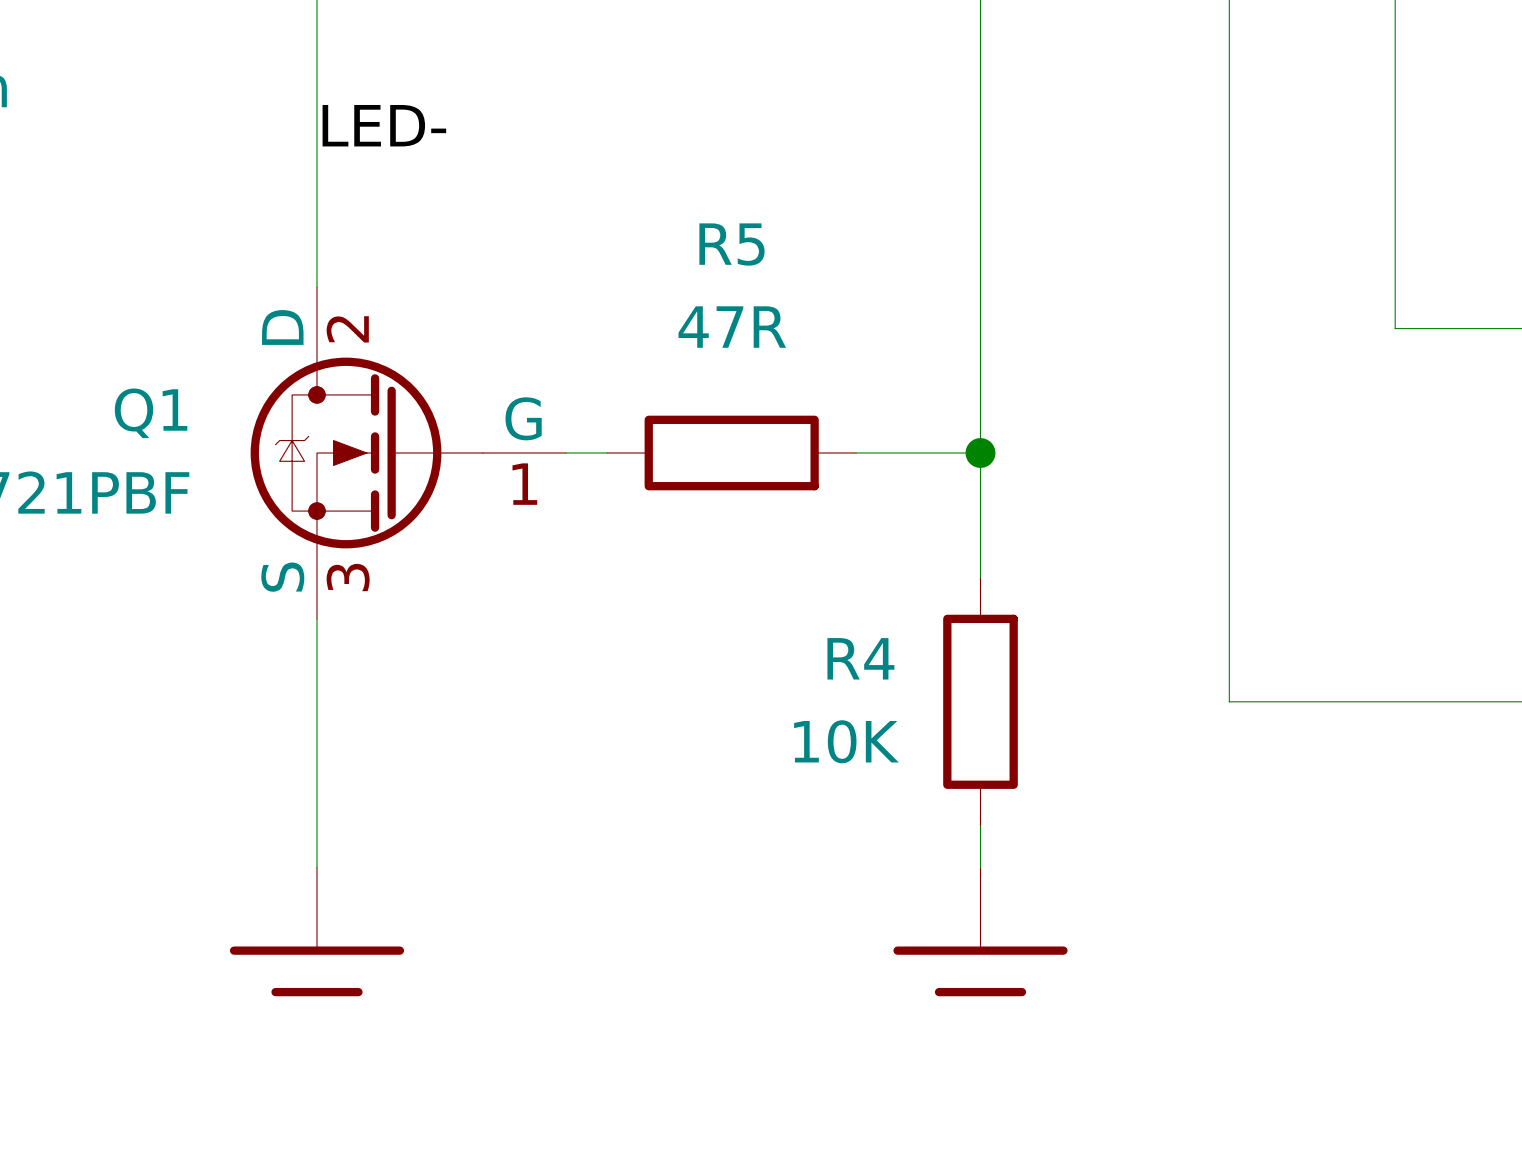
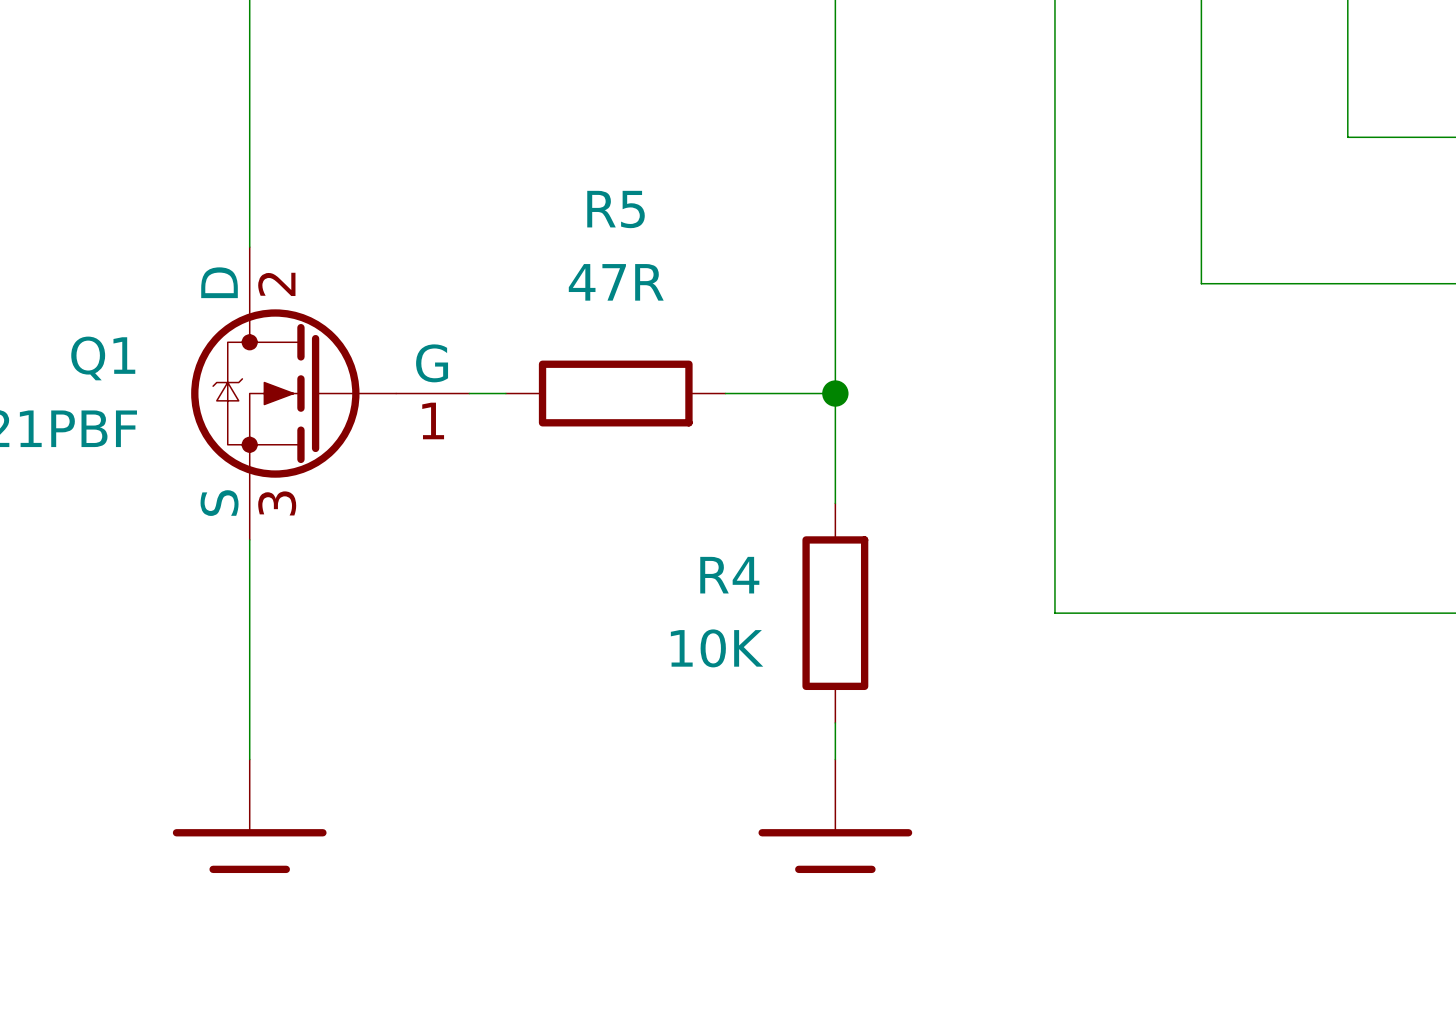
label: LED- (384, 125) -> none

